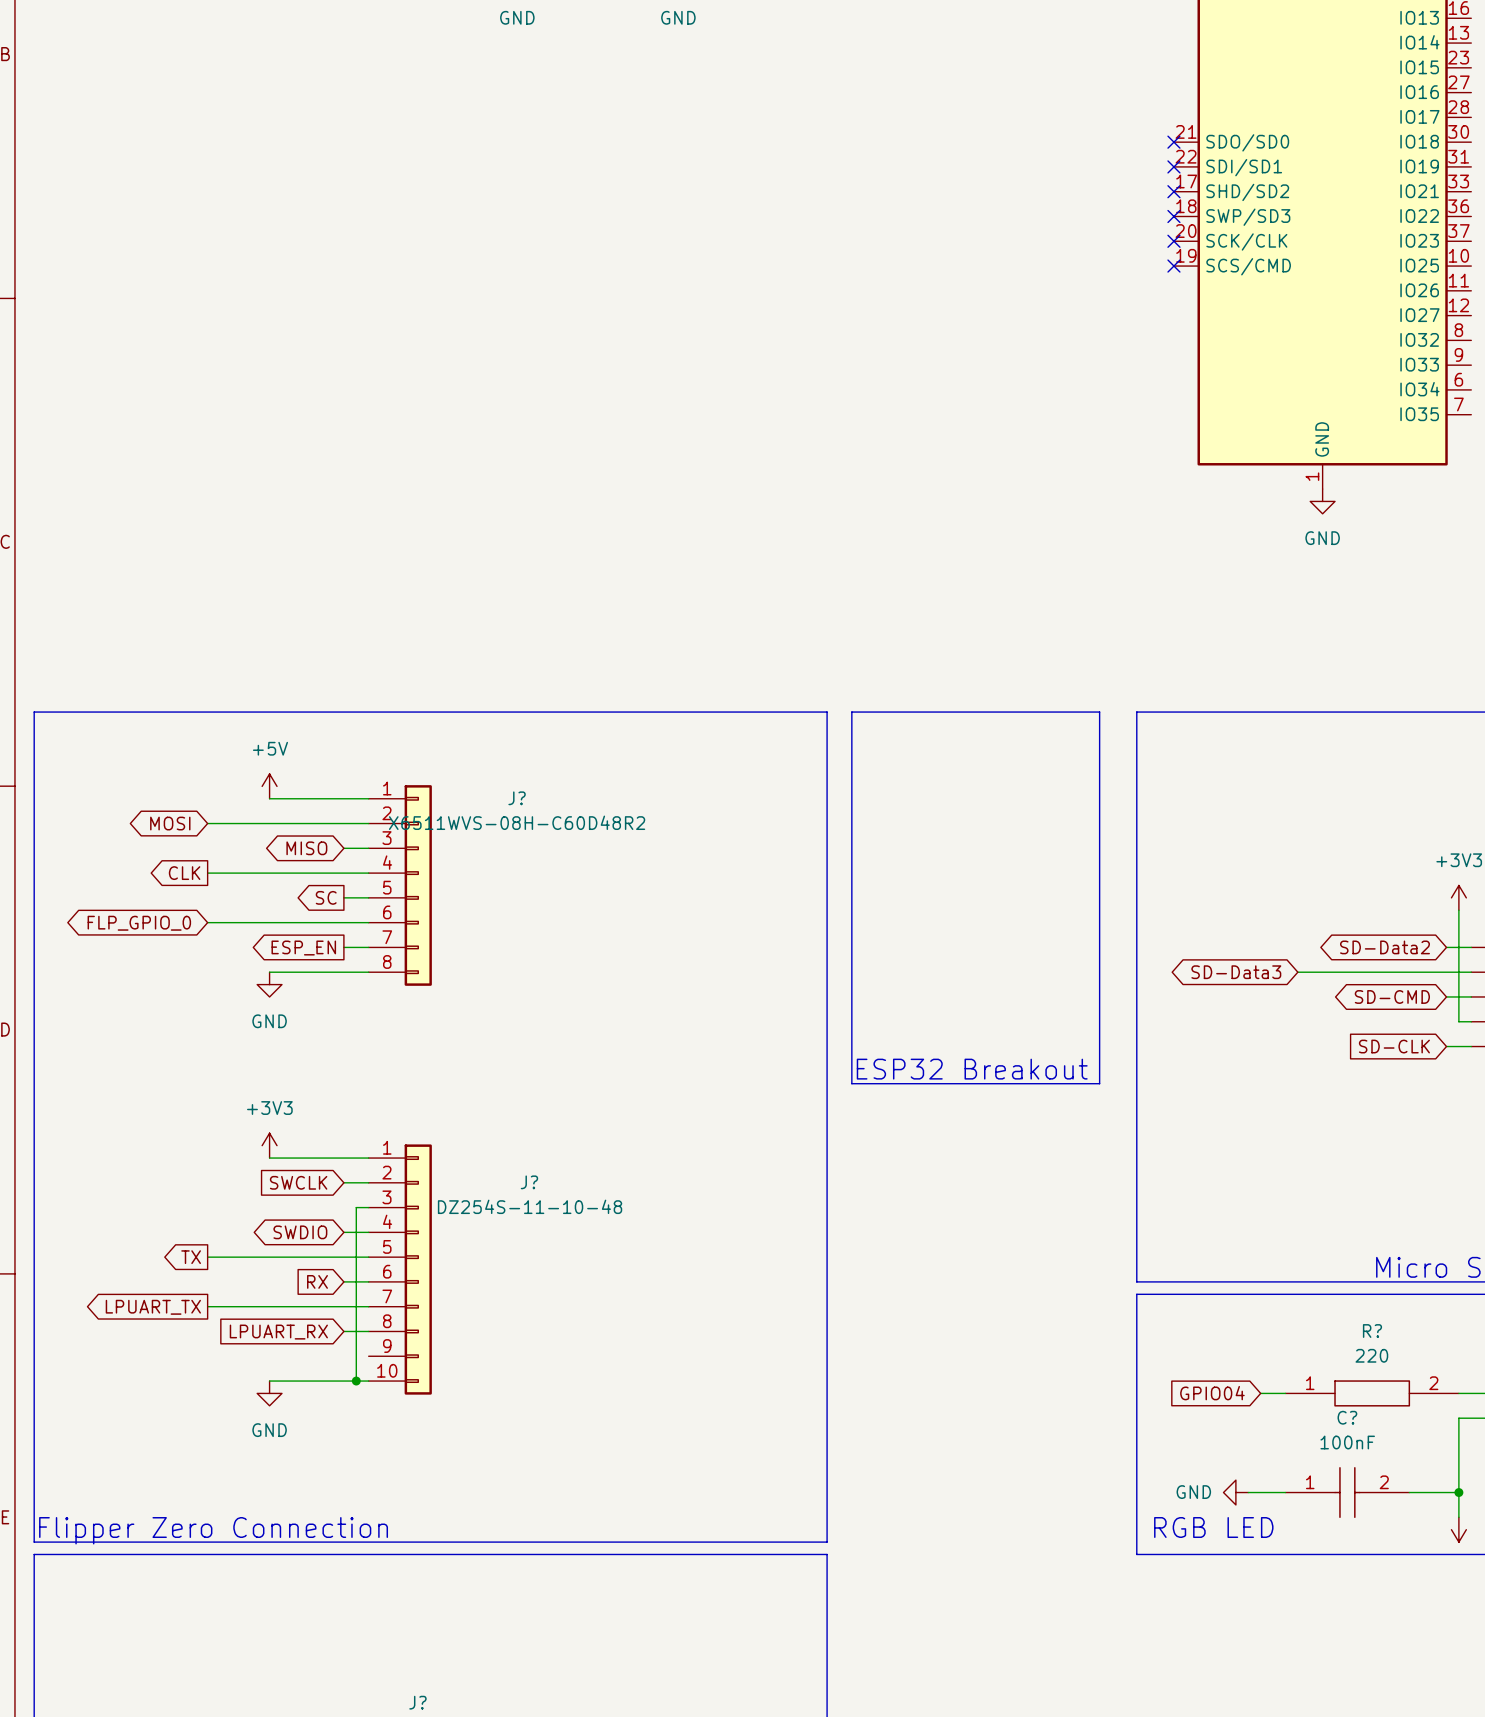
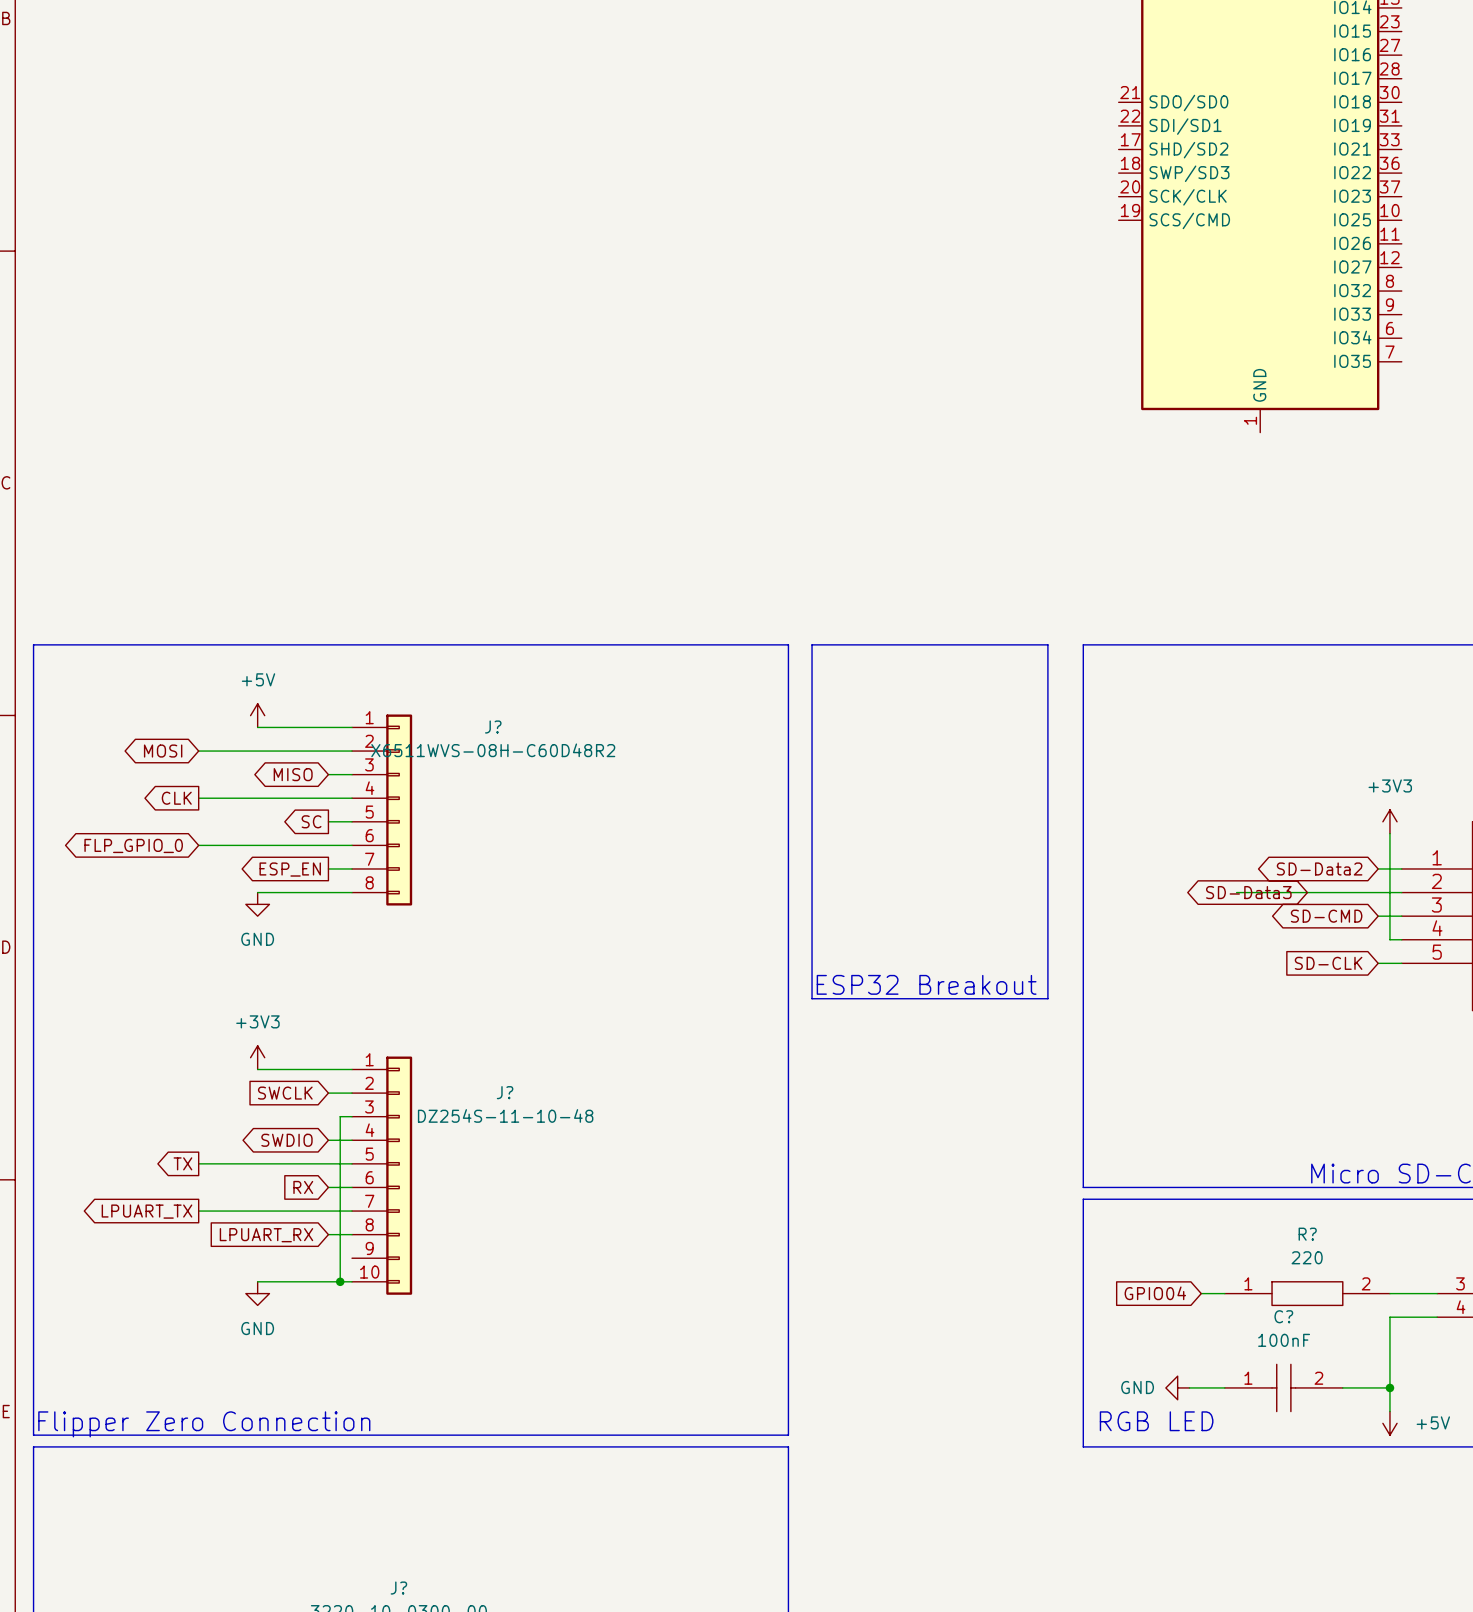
no-connect mark: (1173, 142) -> none
no-connect mark: (1173, 166) -> none
no-connect mark: (1173, 191) -> none
no-connect mark: (1173, 216) -> none
no-connect mark: (1173, 241) -> none
no-connect mark: (1173, 266) -> none
power symbol: GND (1322, 501) -> none
global label position: SD-Data3 (1236, 972) -> SD-Data3 (1248, 892)

